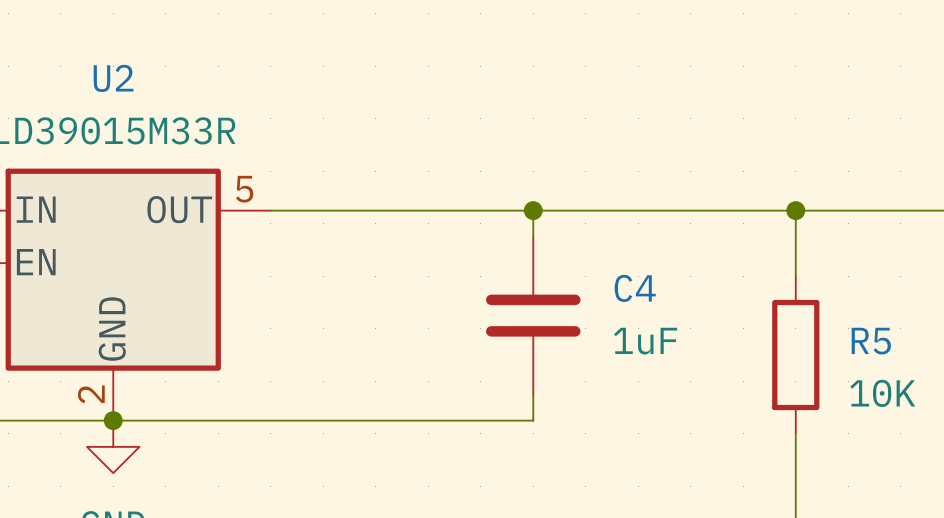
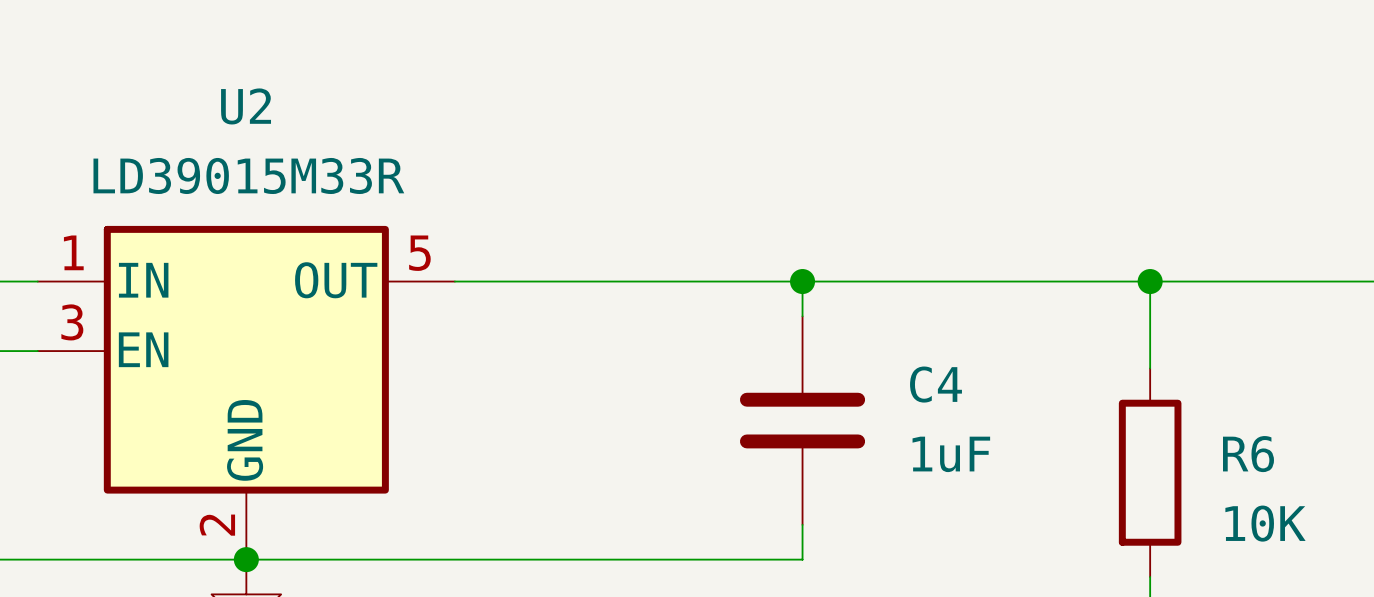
R5 name: R5 (871, 341) -> R6 (1248, 454)

